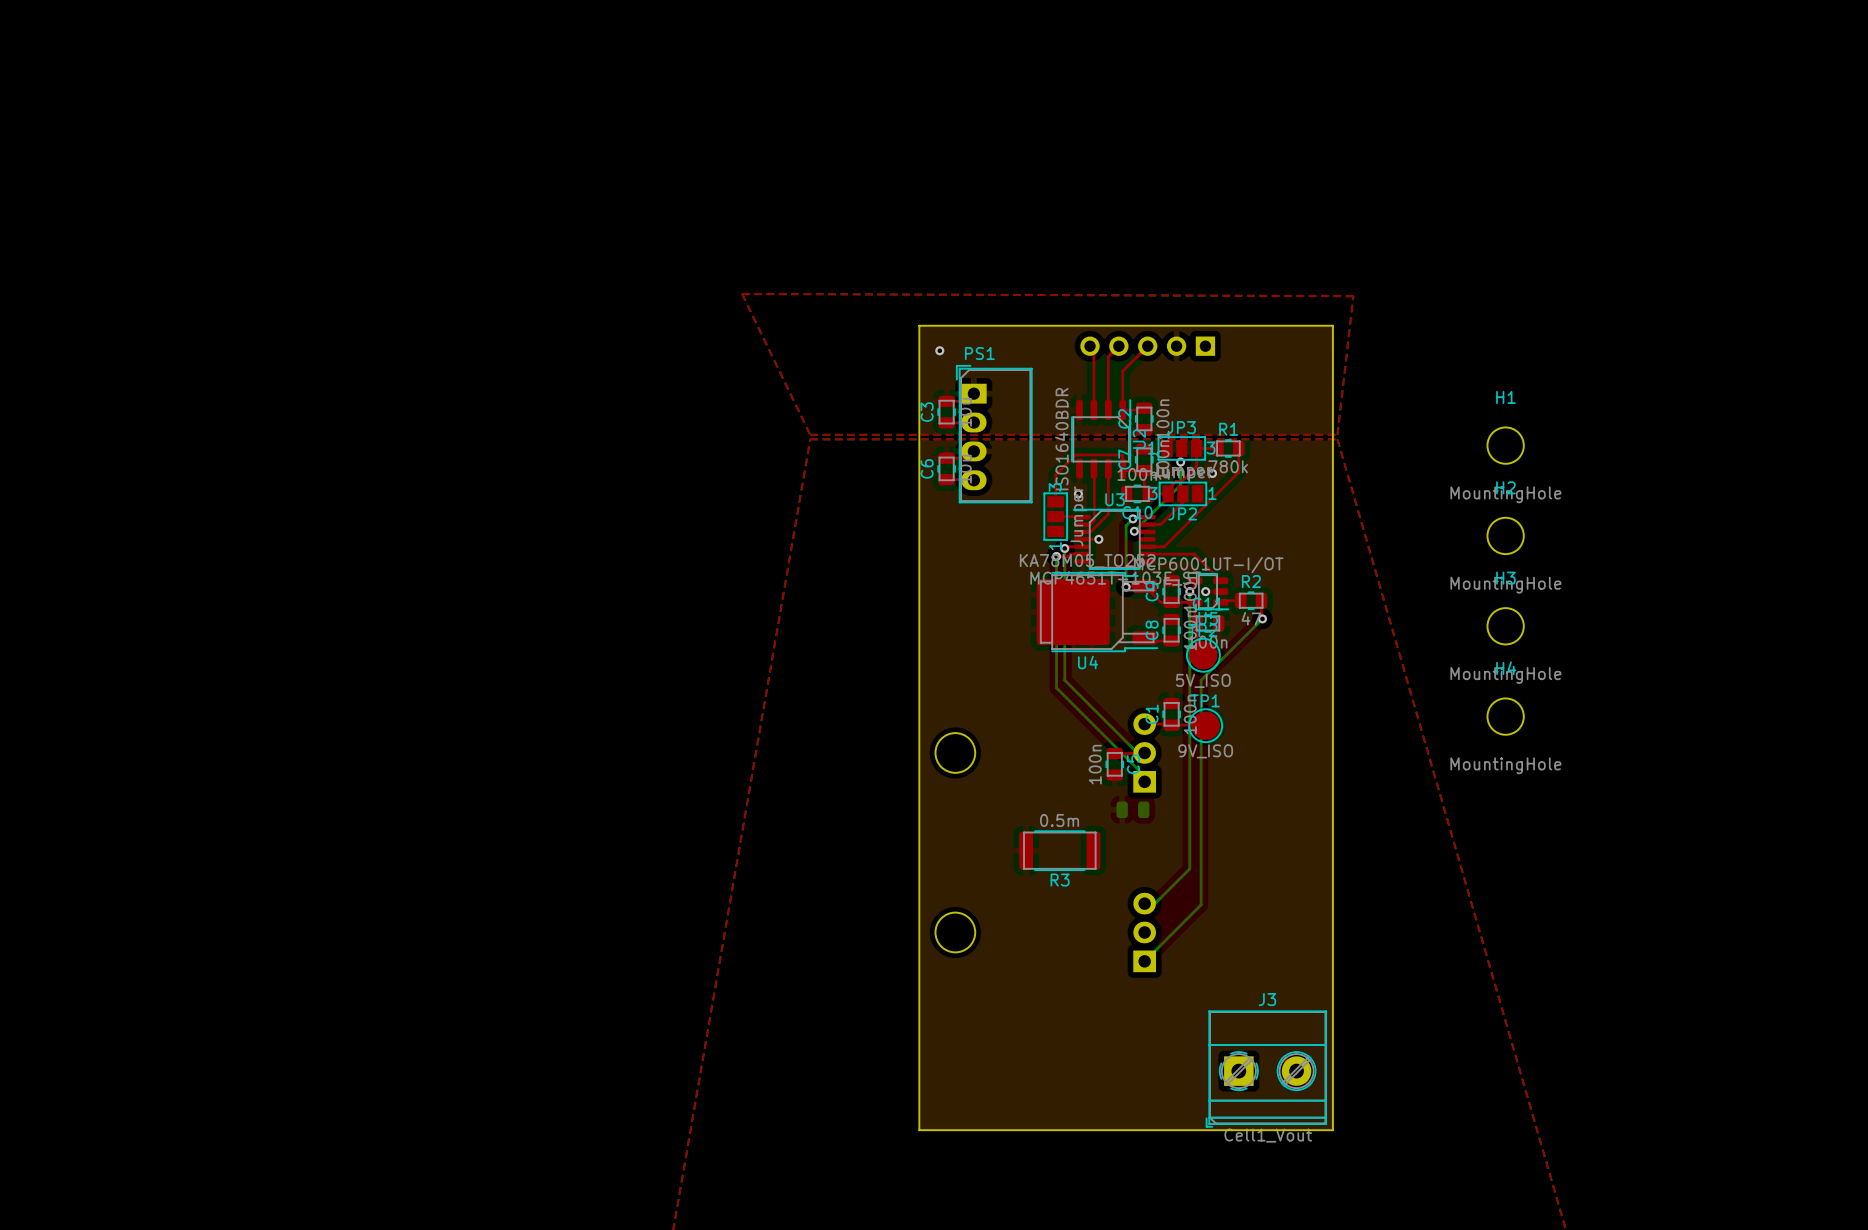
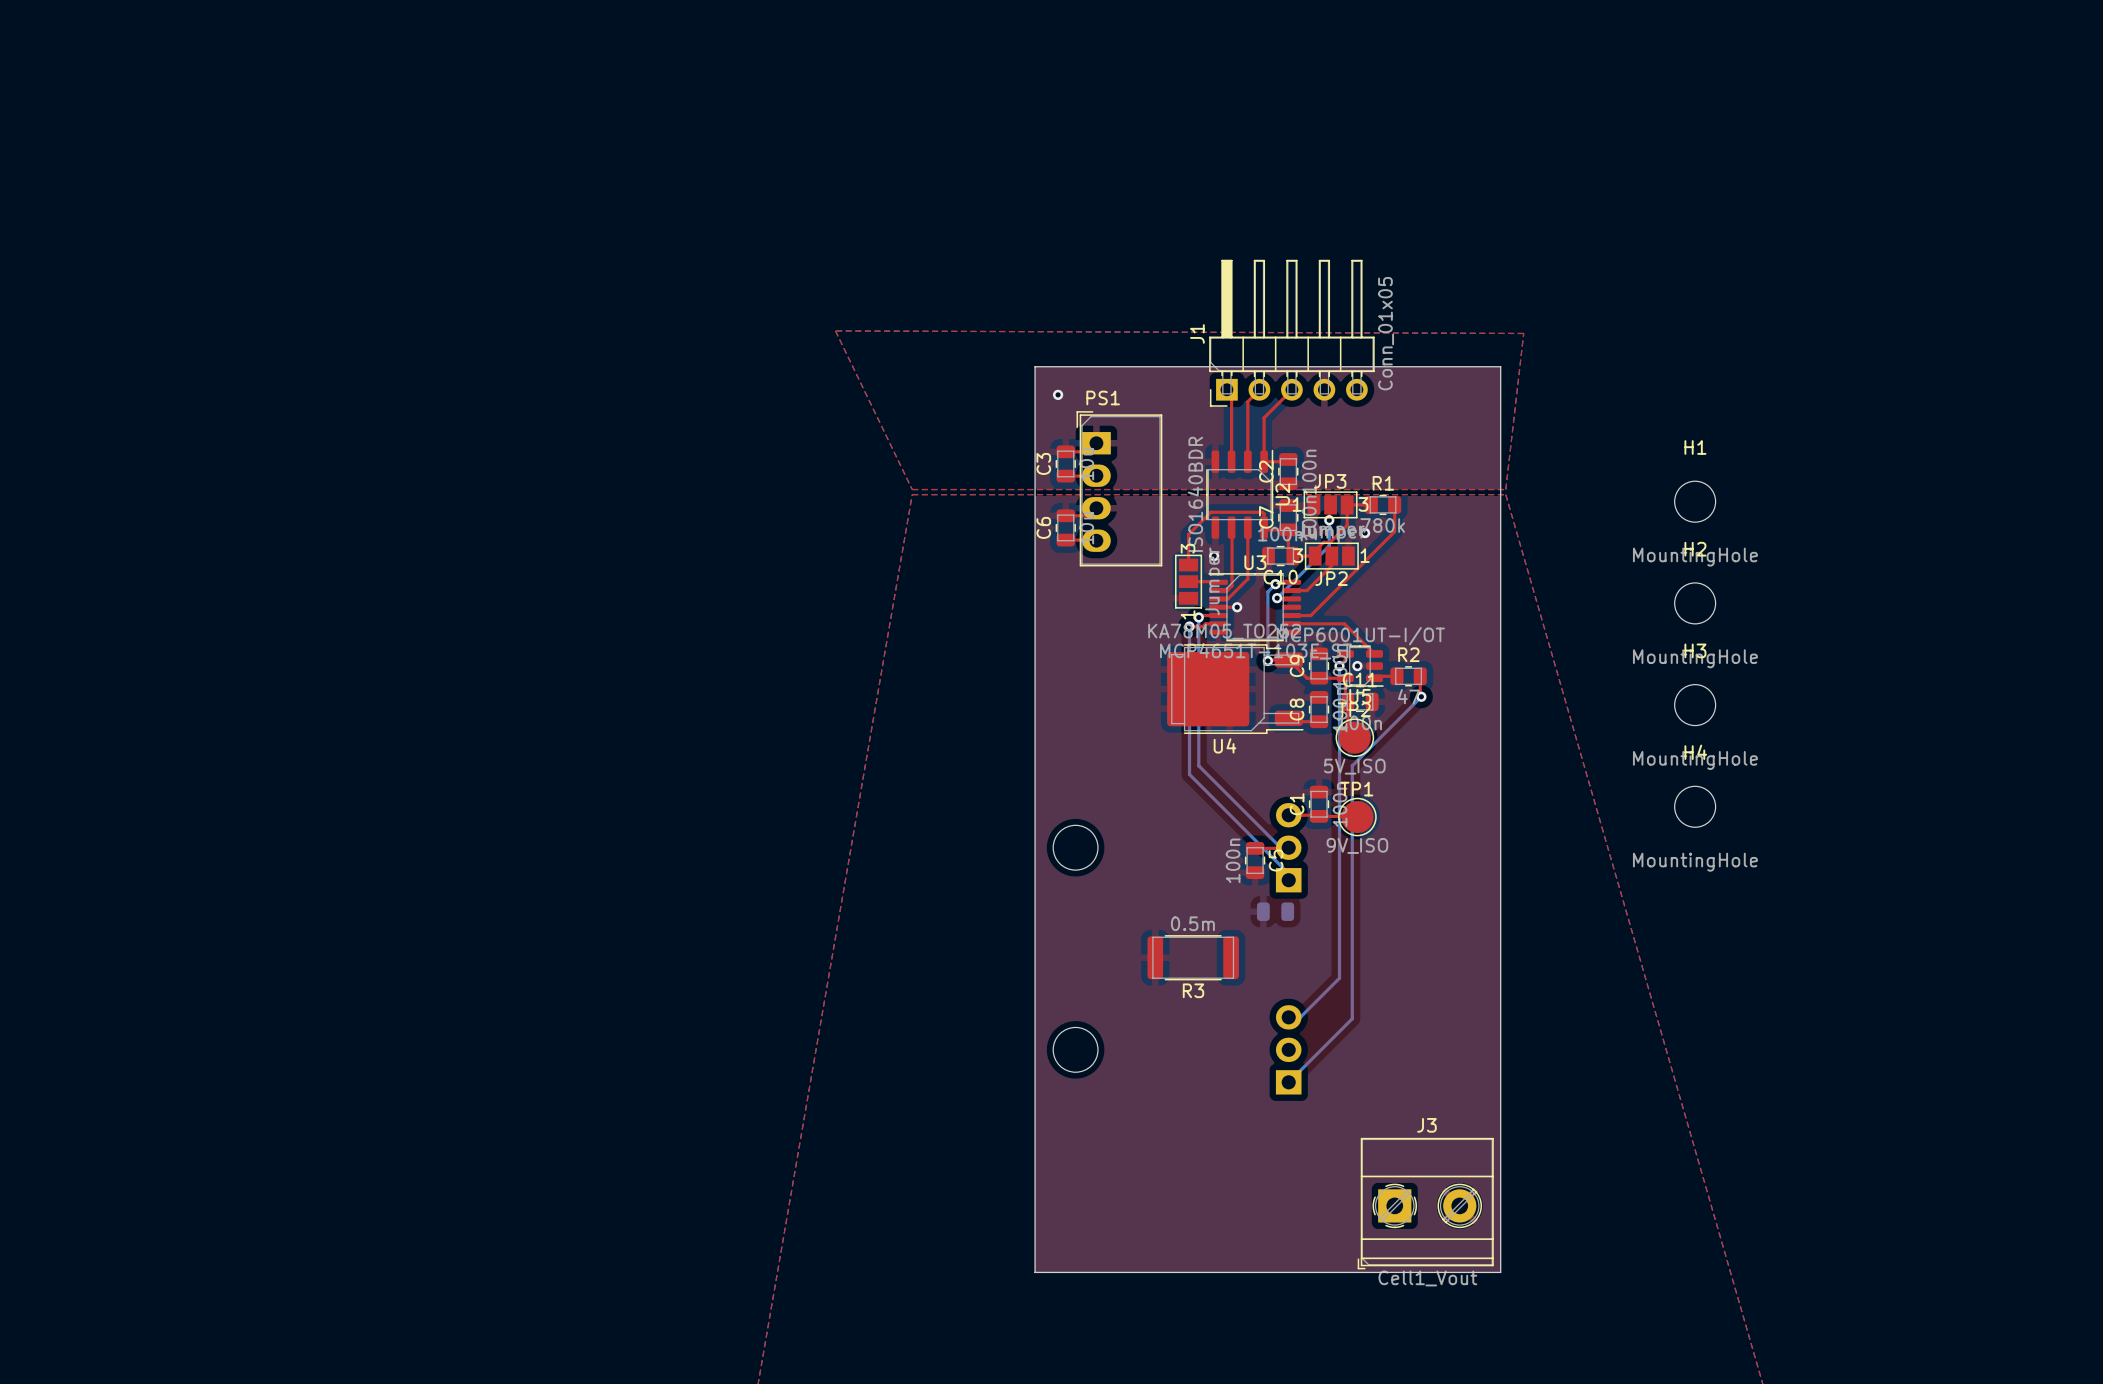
J1 side: bottom (1147, 346) -> top (1291, 333)

